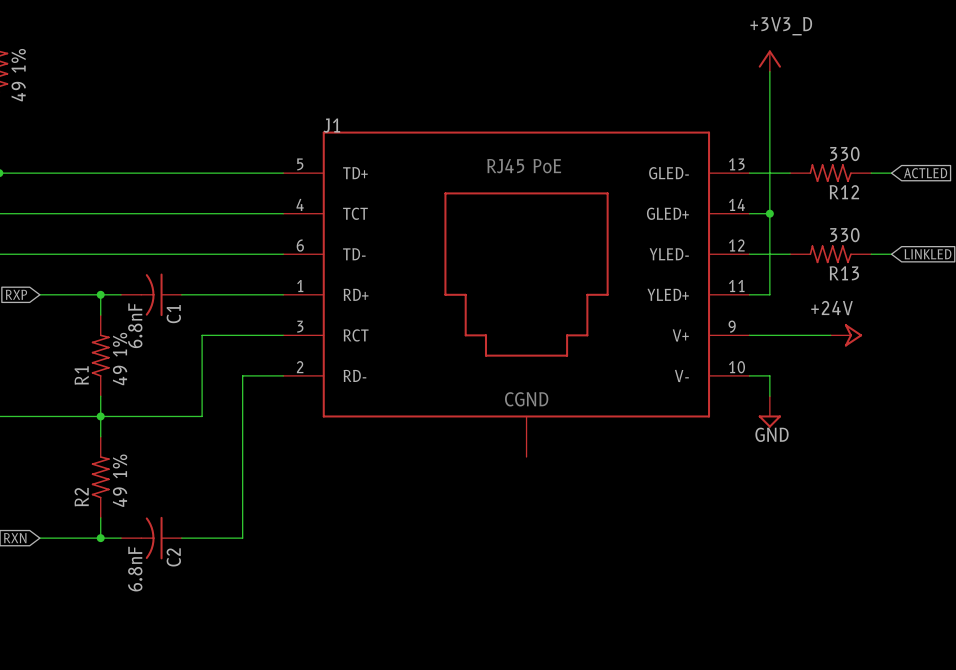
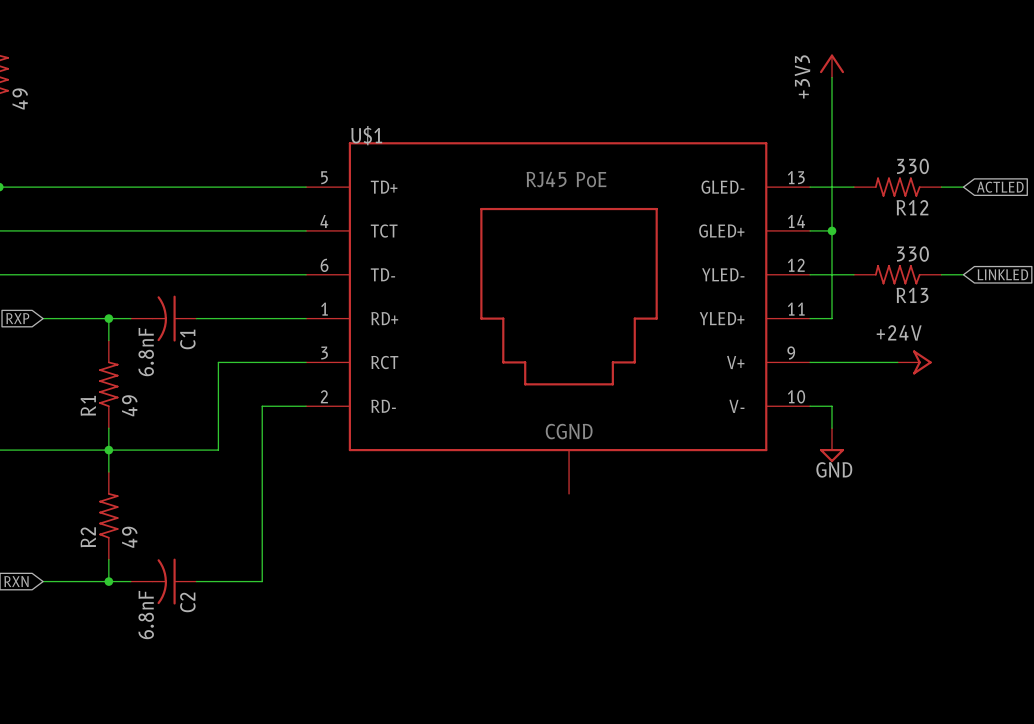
power symbol: +3V3_D (769, 61) -> +3V3 (832, 66)
part value: 49 1% (18, 75) -> 49 (20, 98)
J1 name: J1 (331, 125) -> U$1 (366, 135)
R1 value: 49 1% (120, 359) -> 49 (129, 405)
R2 value: 49 1% (120, 480) -> 49 (129, 537)

